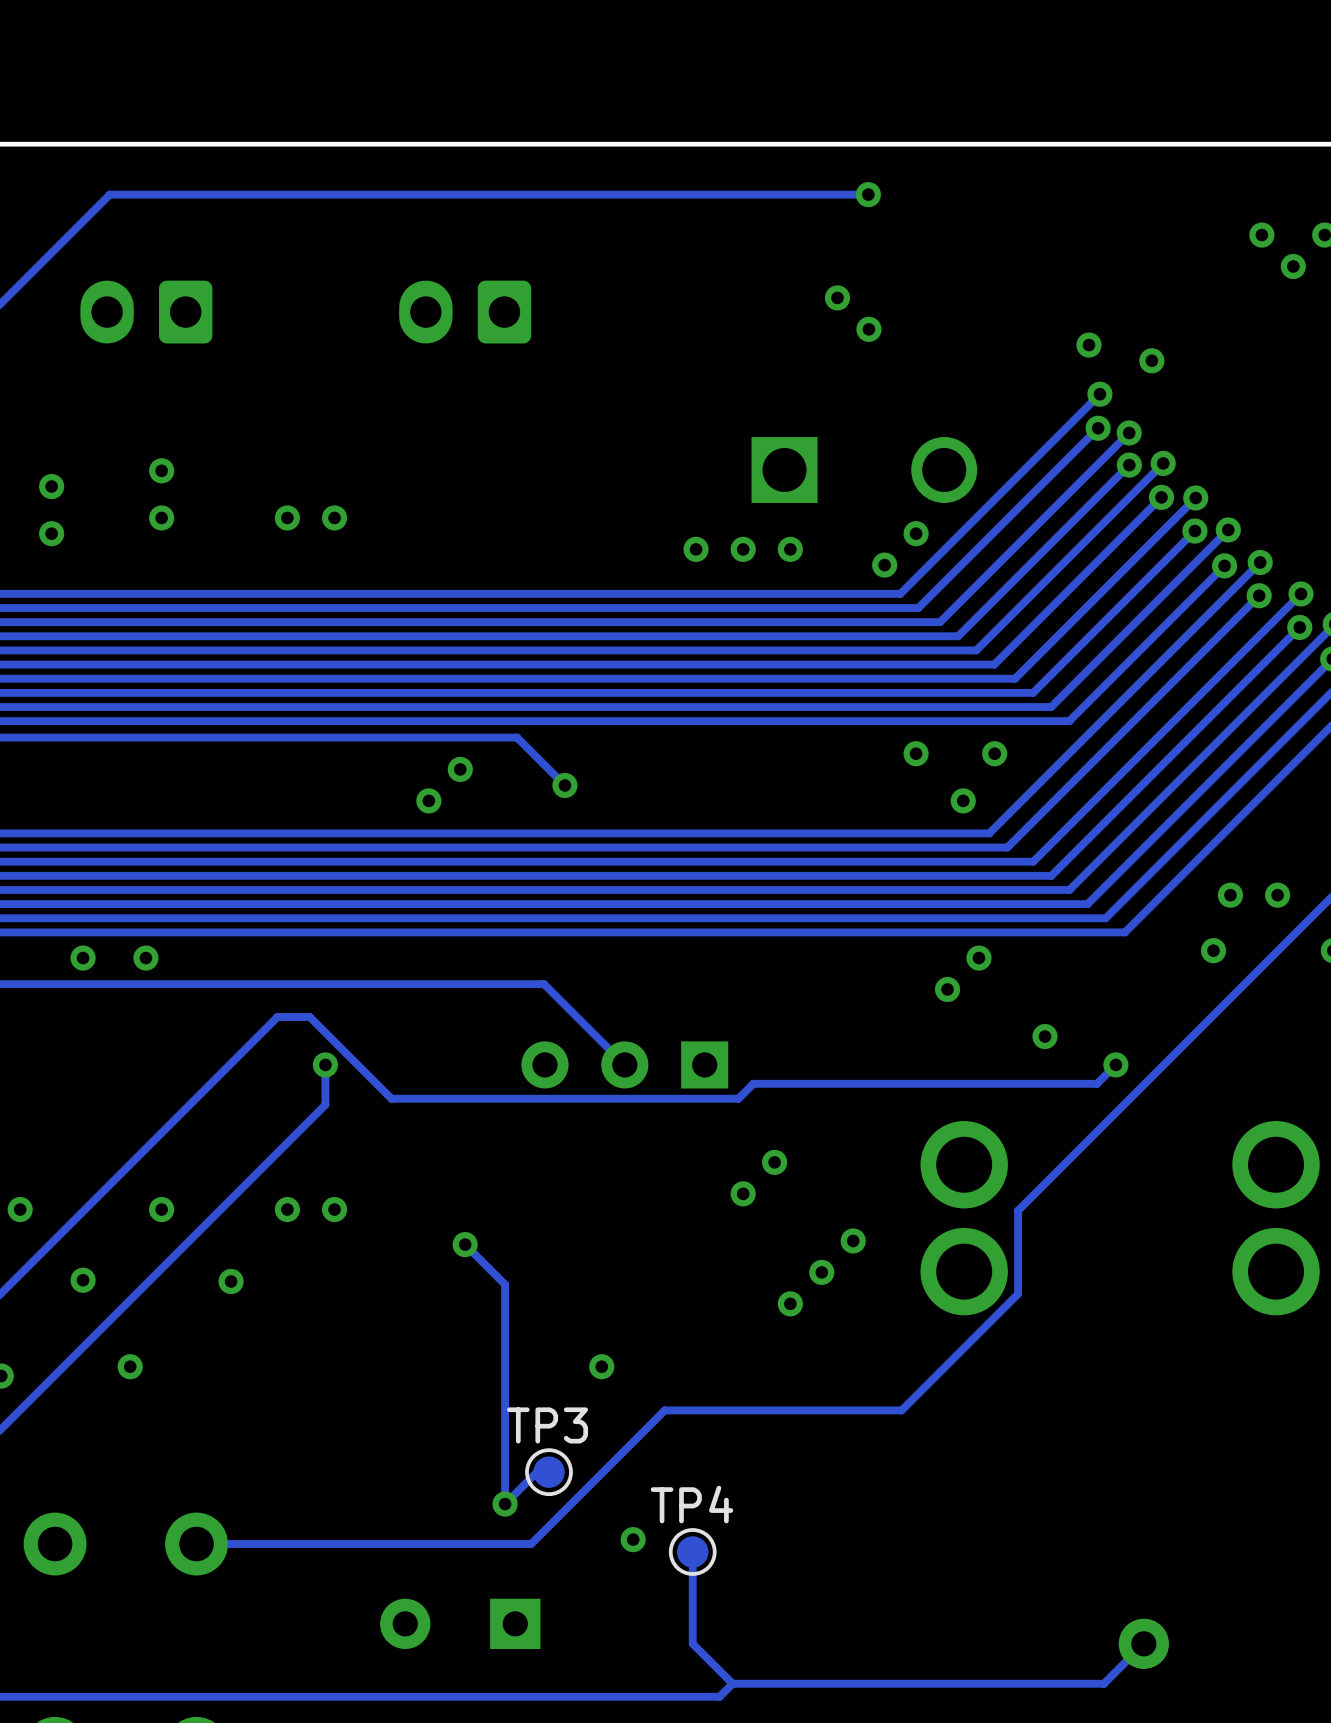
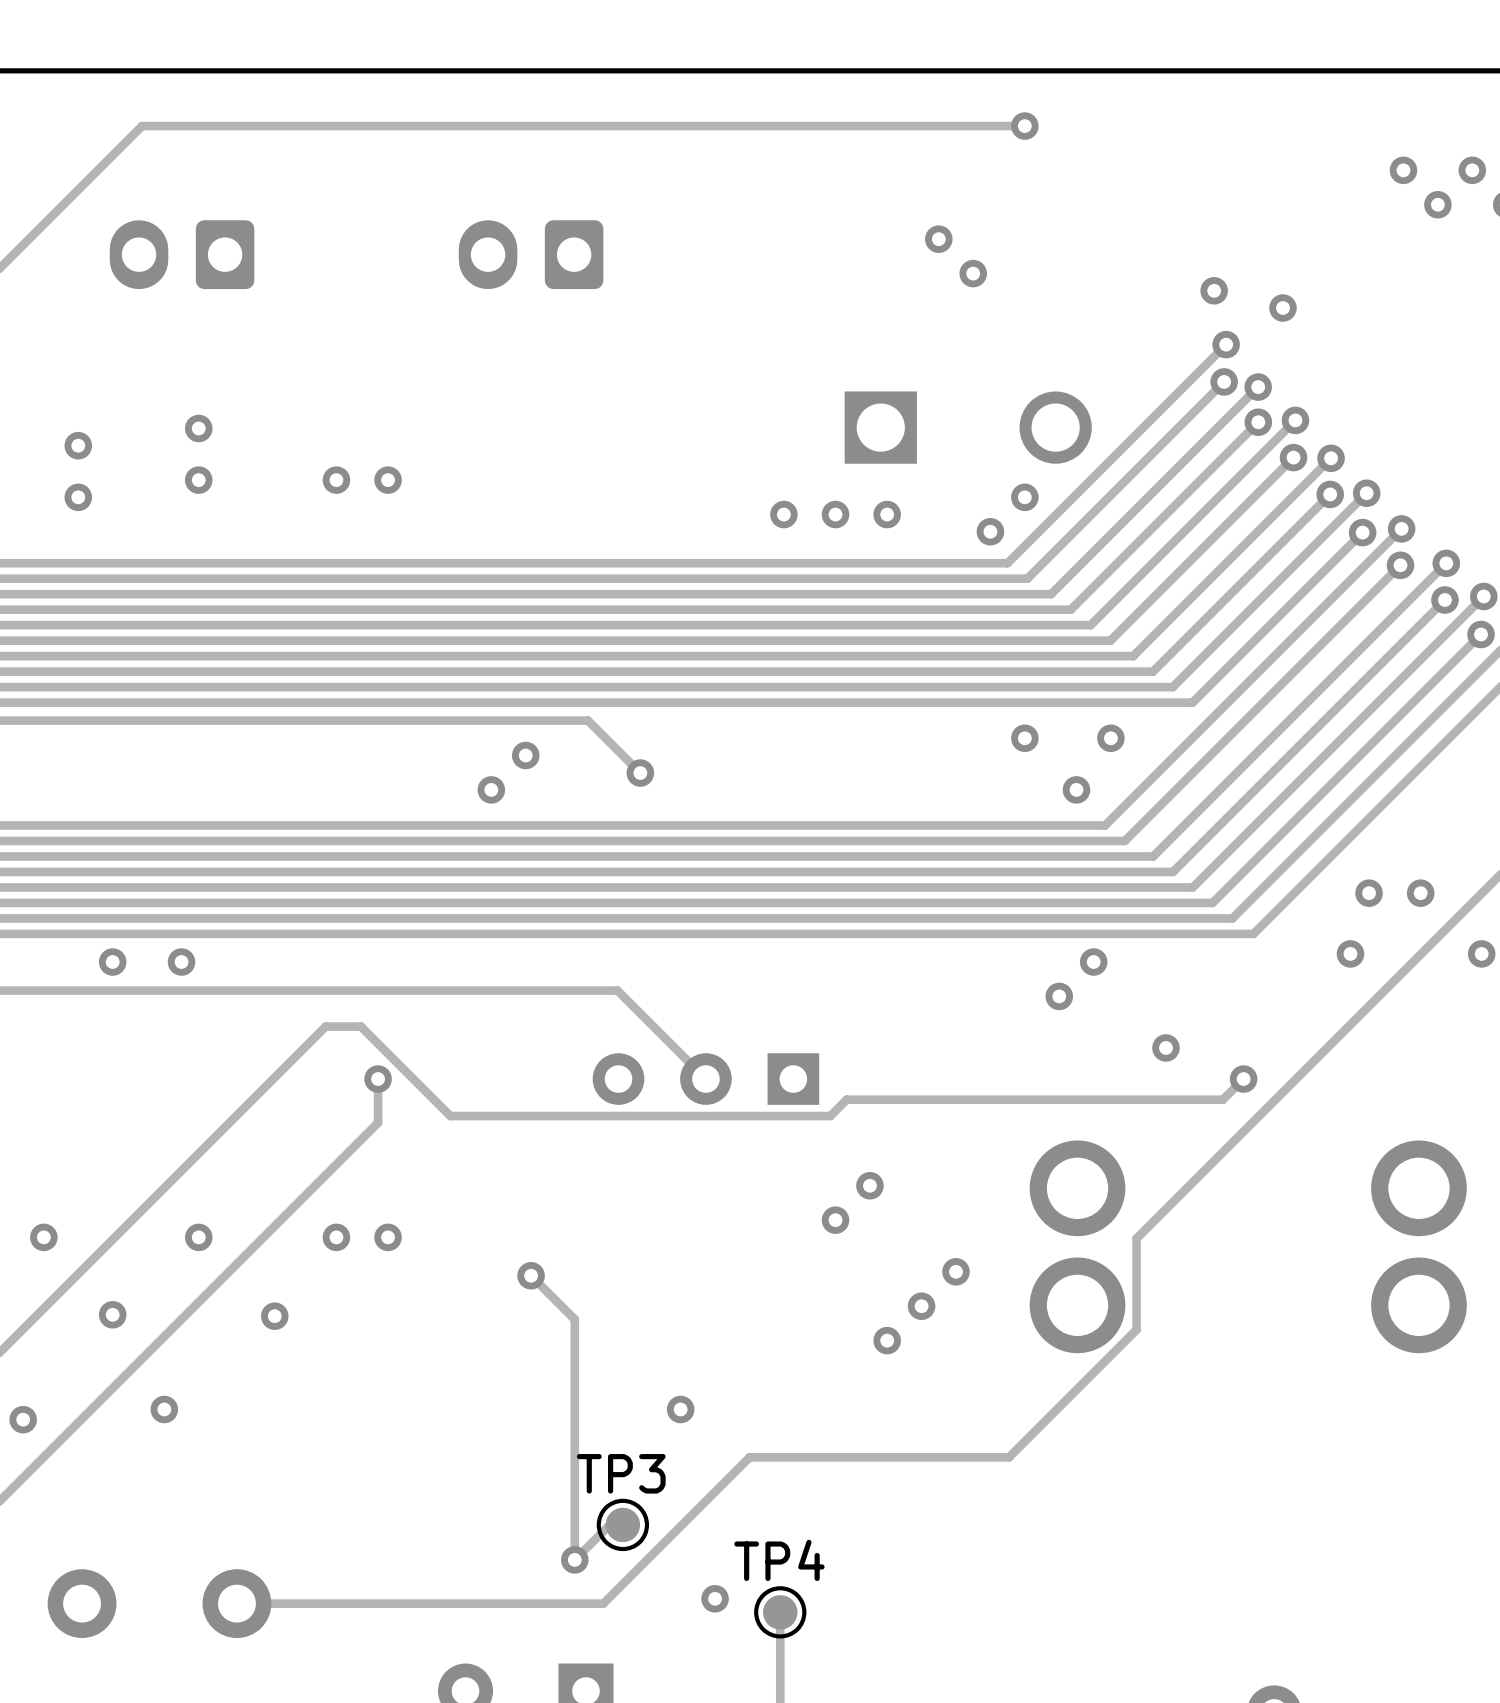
via position: (868, 194) -> (1024, 126)
track: none -> (1024, 126) (972, 126)

